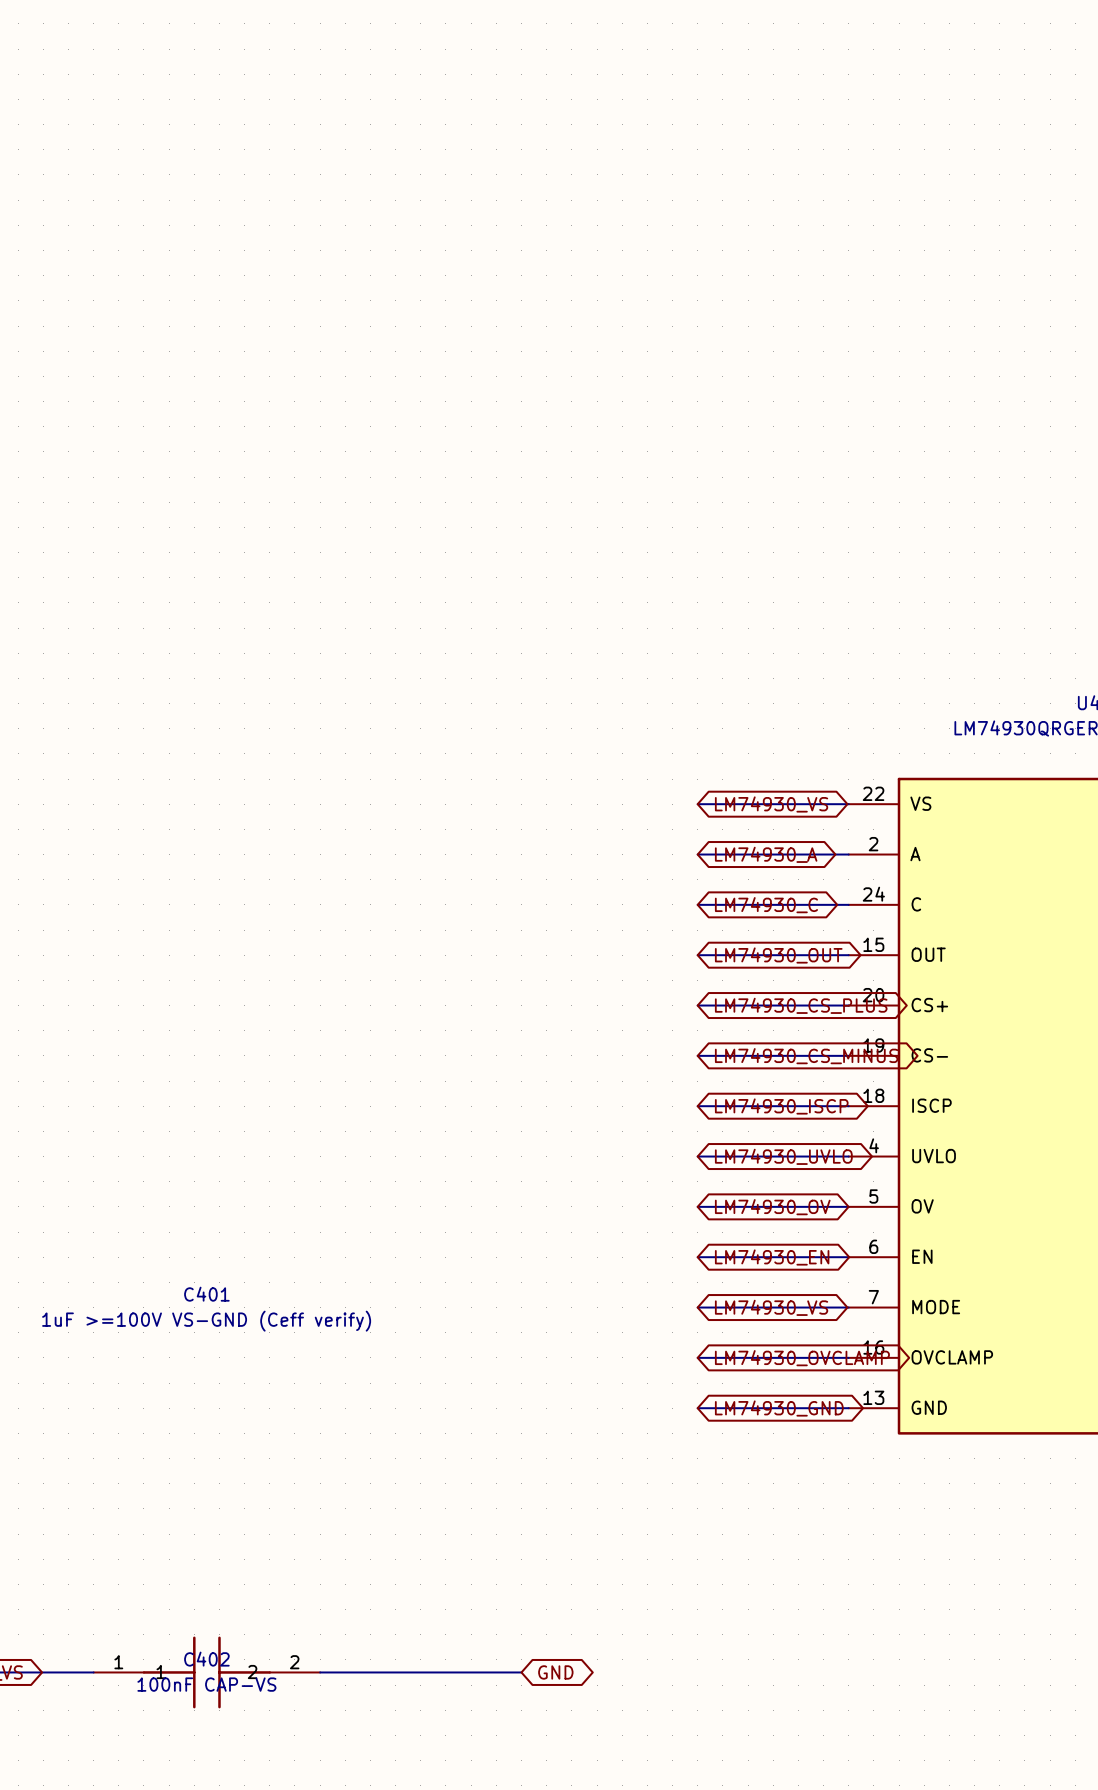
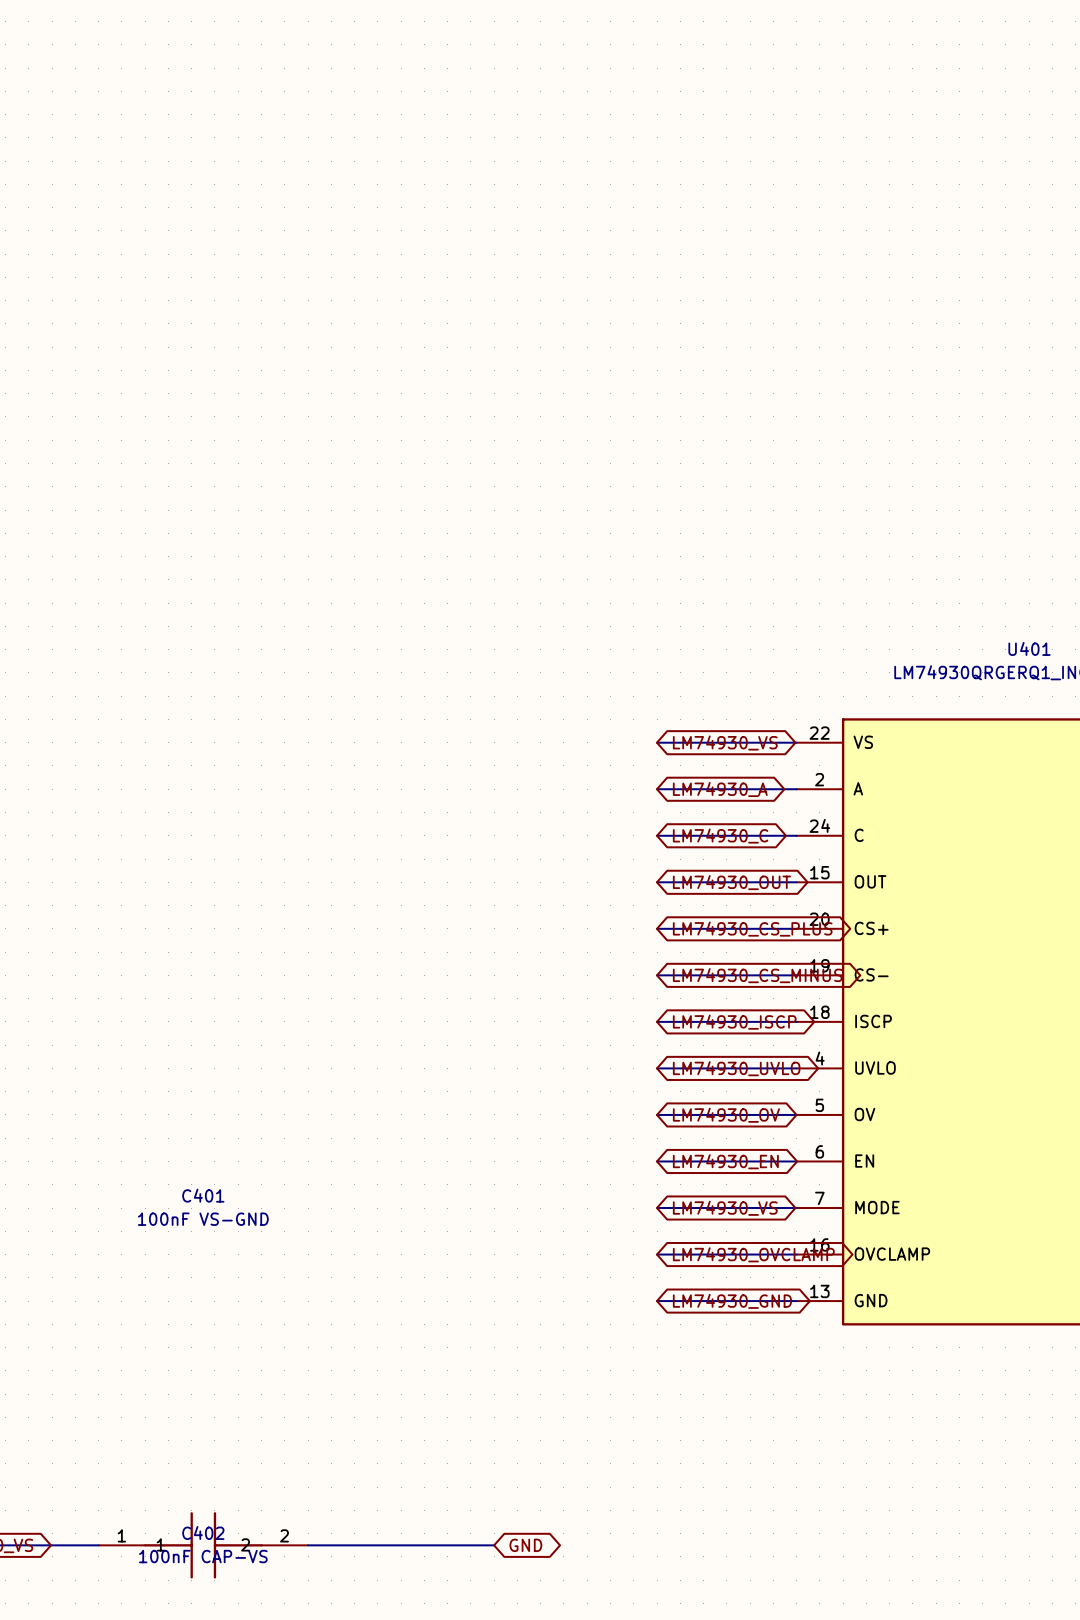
C401 value: 1uF >=100V VS-GND (Ceff verify) (206, 1321) -> 100nF VS-GND (203, 1219)

